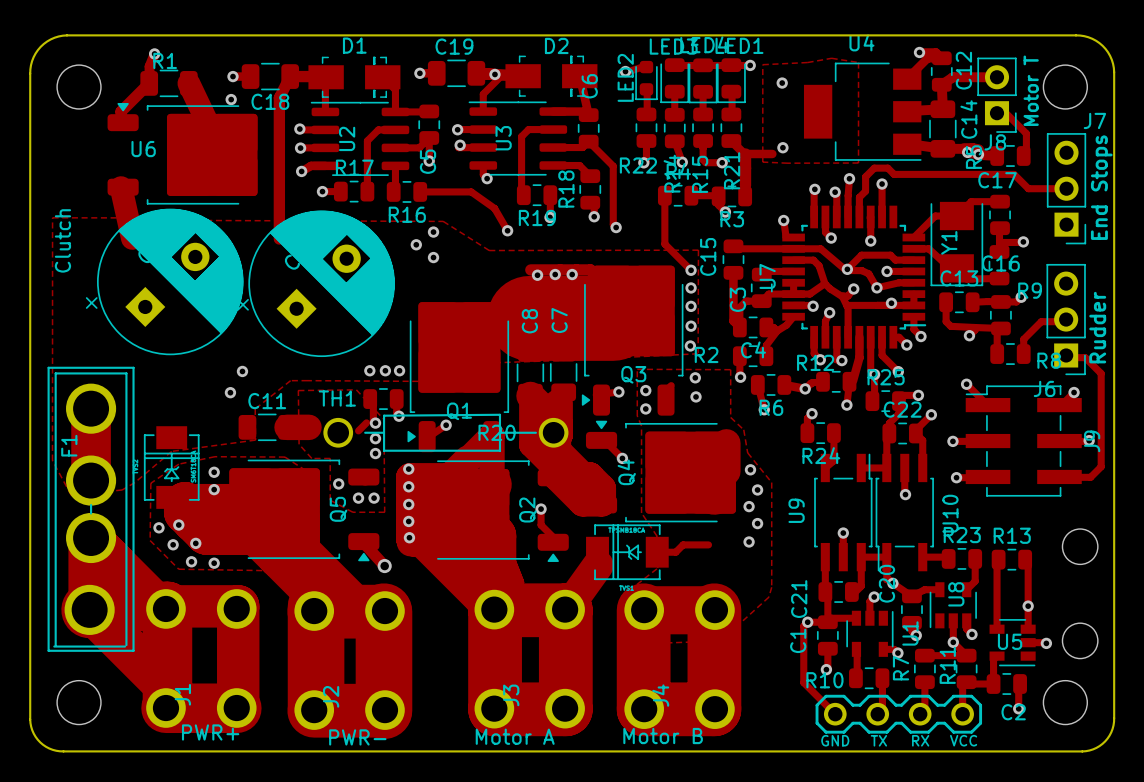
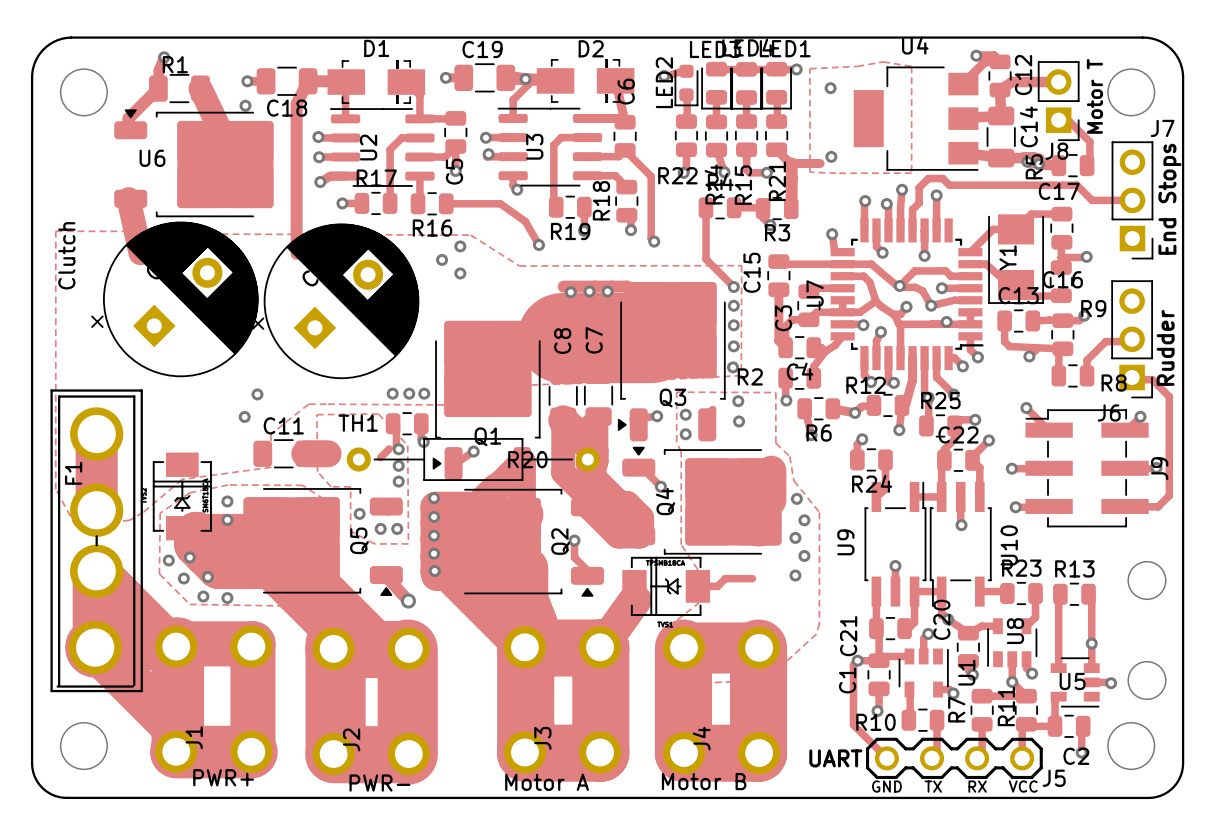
R20 footprint: [323, 413, 569, 452] -> [346, 438, 600, 481]
text: none -> UART (835, 758)
J5 name: none -> J5 (1054, 778)

